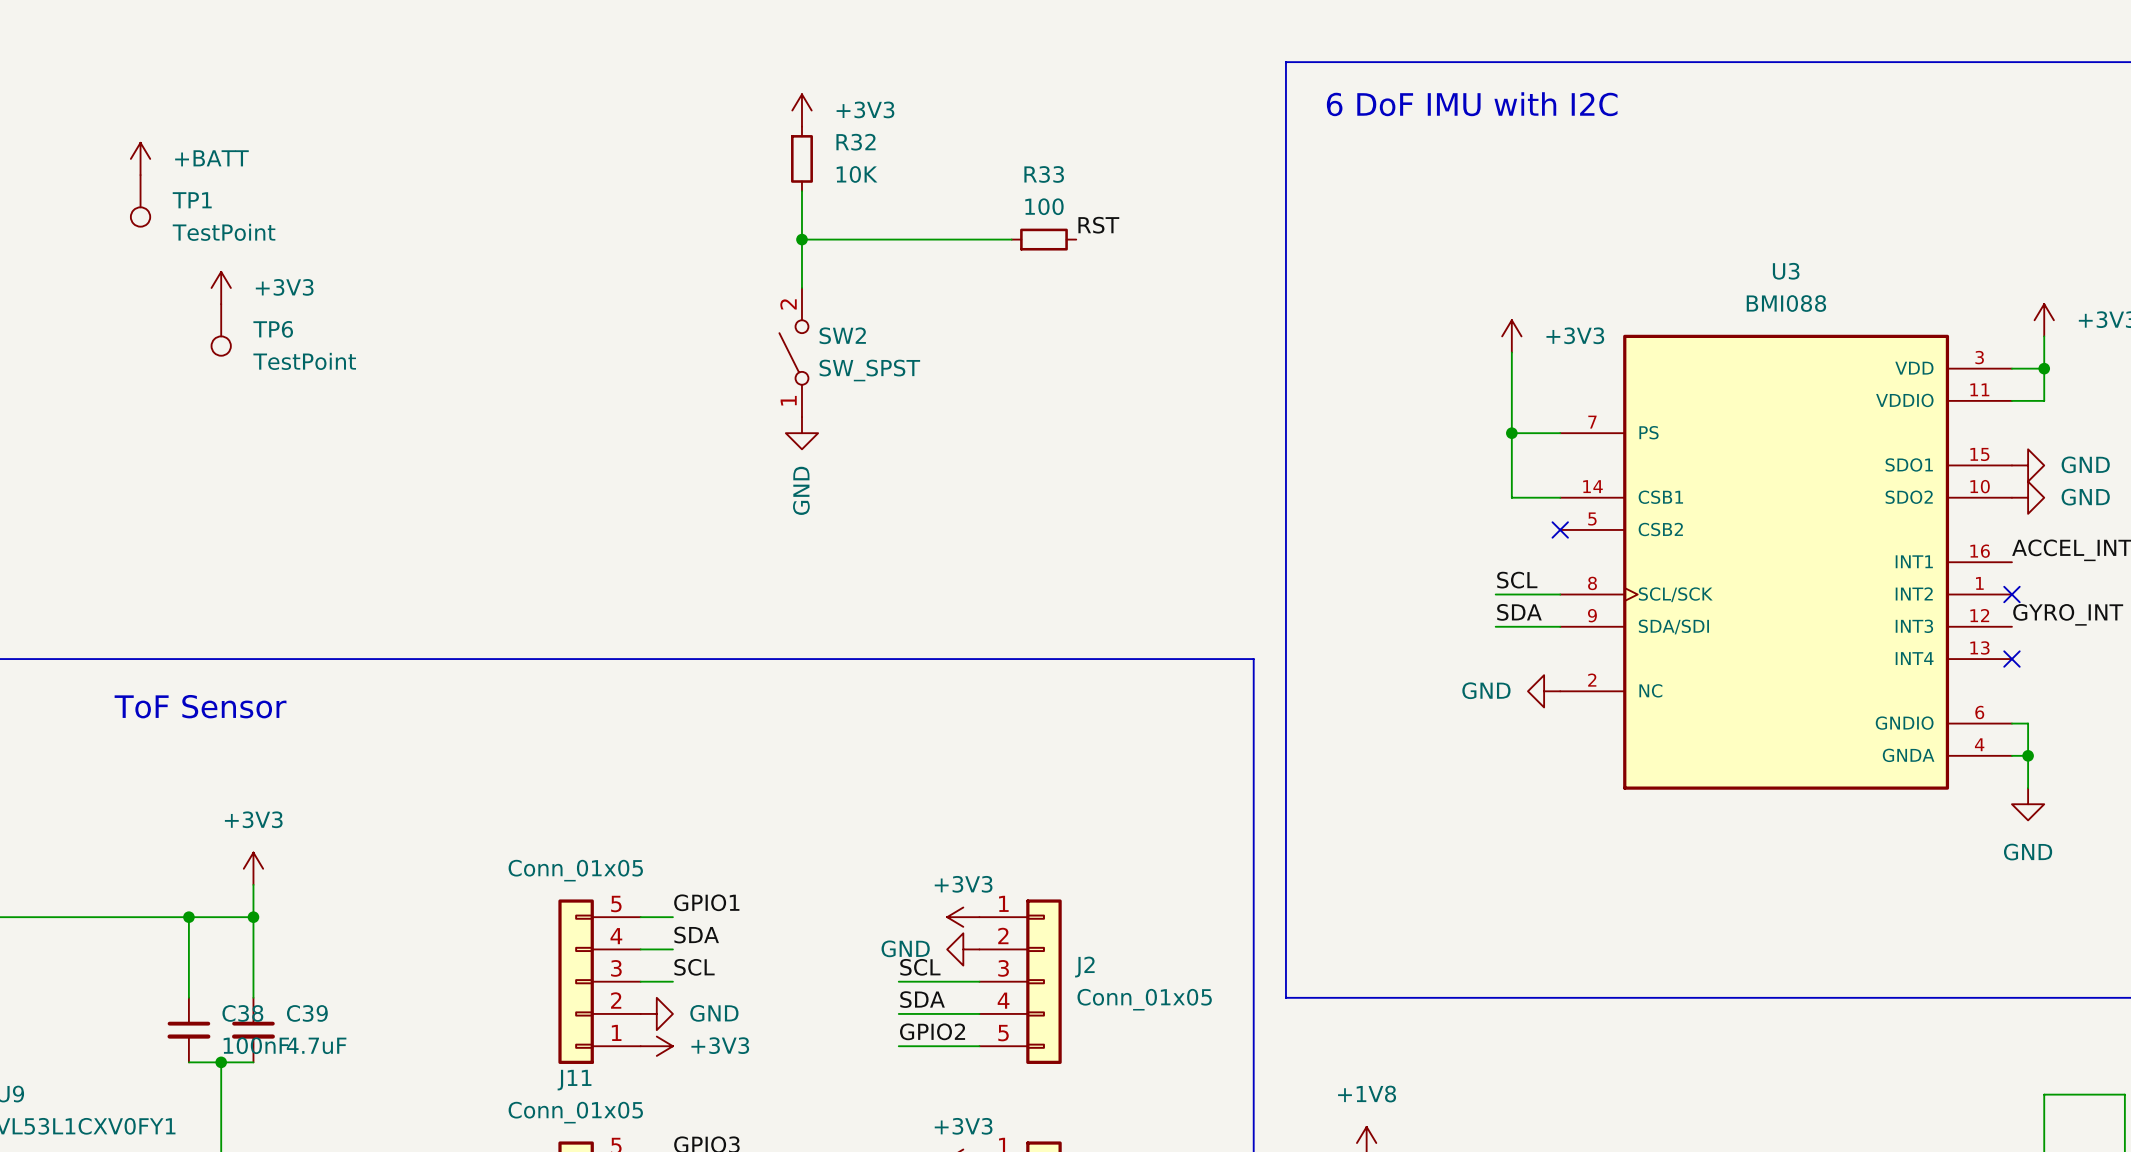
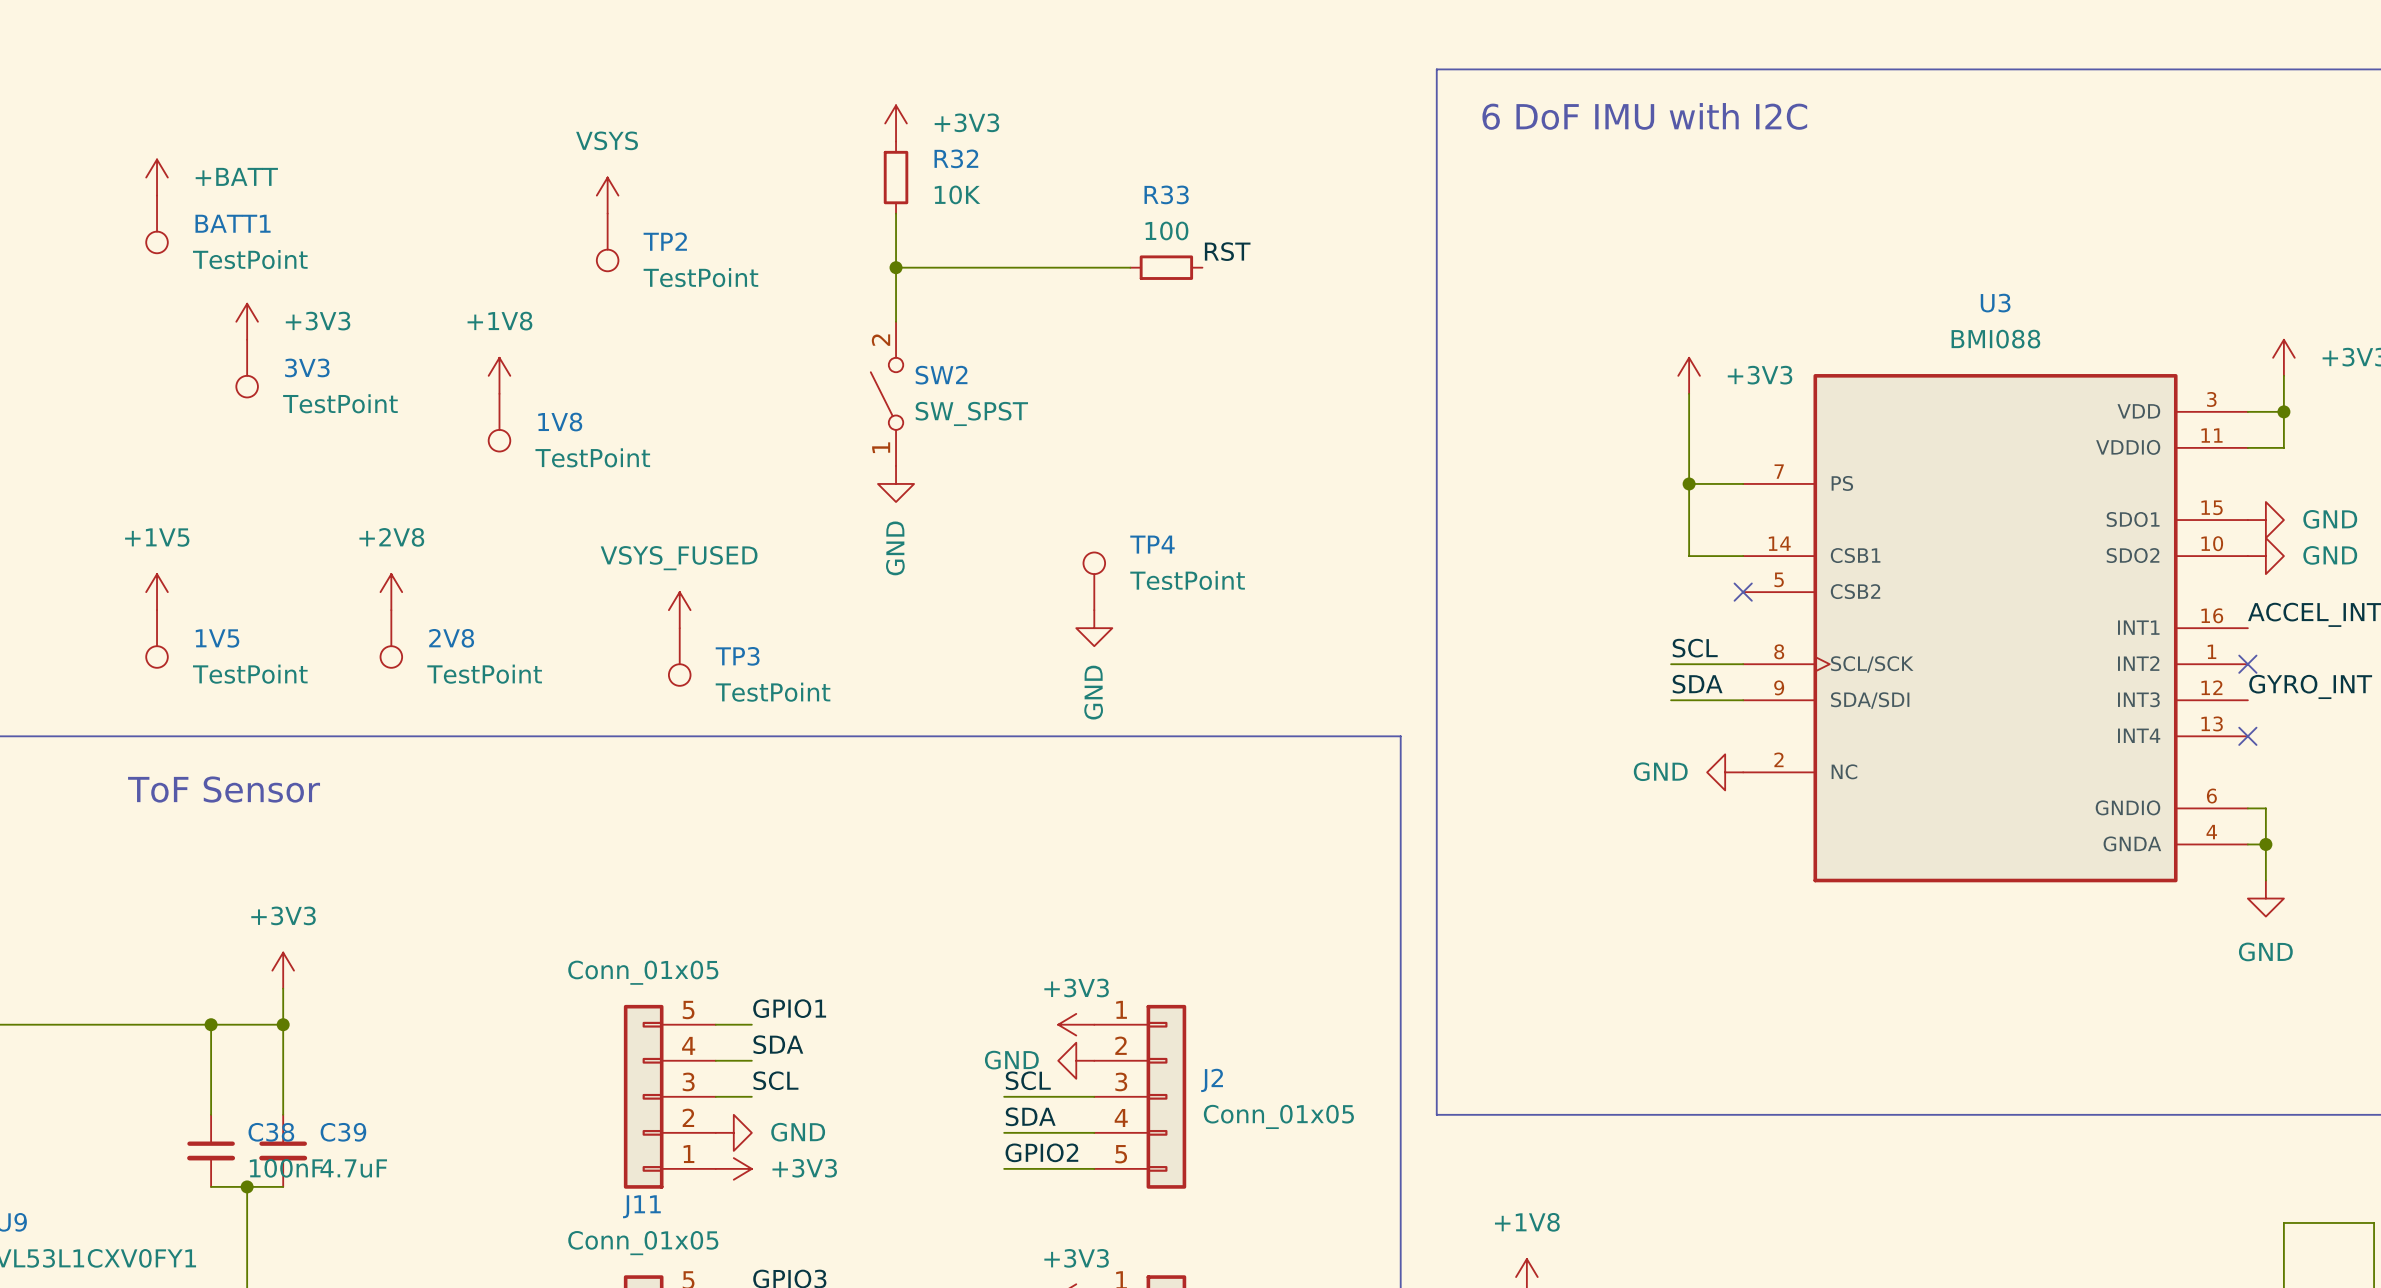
power symbol: none -> VSYS (607, 195)
TP1 name: TP1 (192, 200) -> BATT1 (233, 223)
TP2: none -> TestPoint (607, 242)
TP6 name: TP6 (273, 329) -> 3V3 (307, 367)
power symbol: none -> +1V8 (499, 375)
1V8: none -> TestPoint (499, 422)
TP4: none -> TestPoint (1094, 581)
power symbol: none -> +1V5 (157, 592)
power symbol: none -> +2V8 (391, 592)
power symbol: none -> VSYS_FUSED (679, 610)
power symbol: none -> GND (1094, 628)
1V5: none -> TestPoint (157, 638)
2V8: none -> TestPoint (391, 638)
TP3: none -> TestPoint (679, 657)

